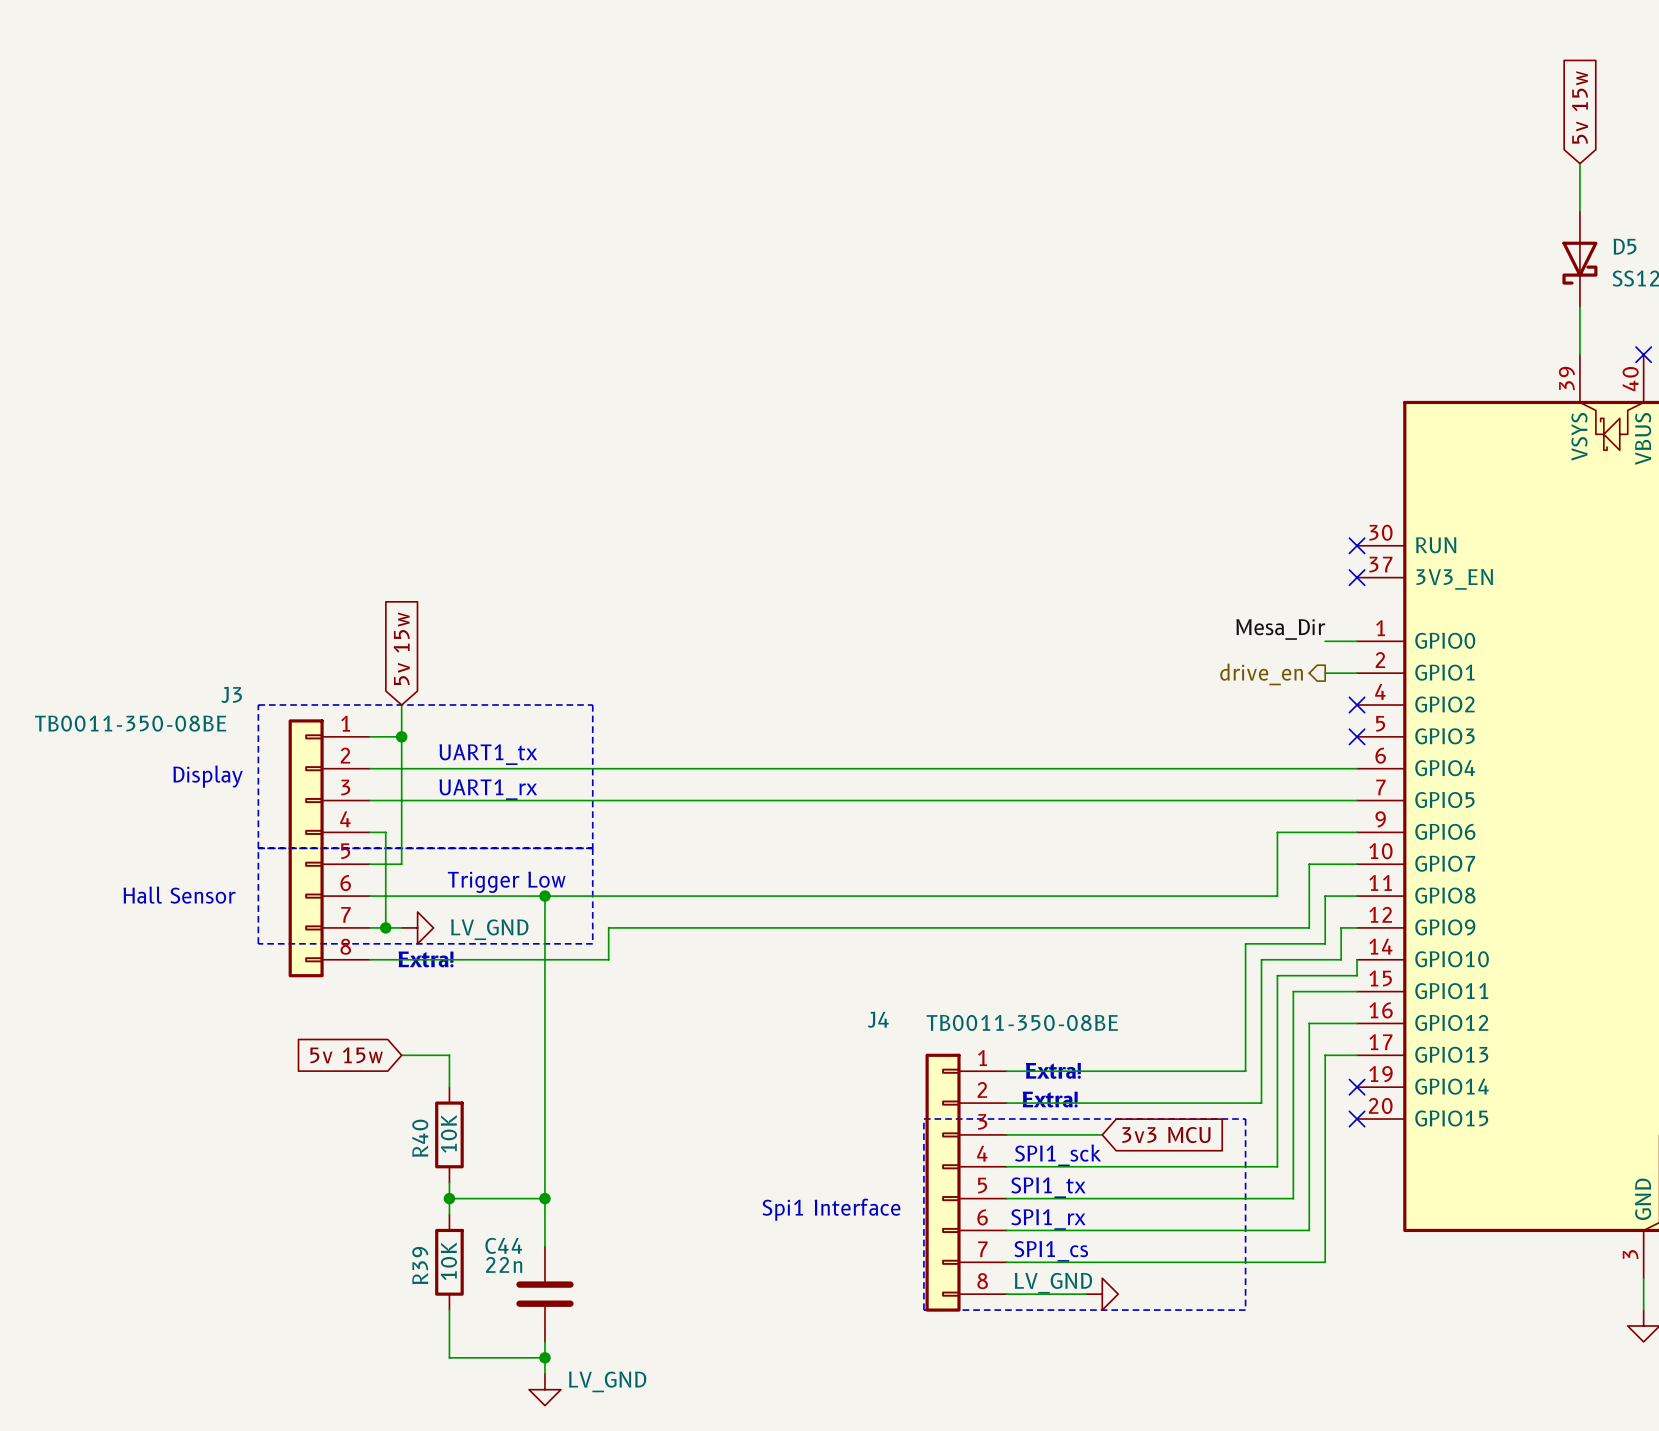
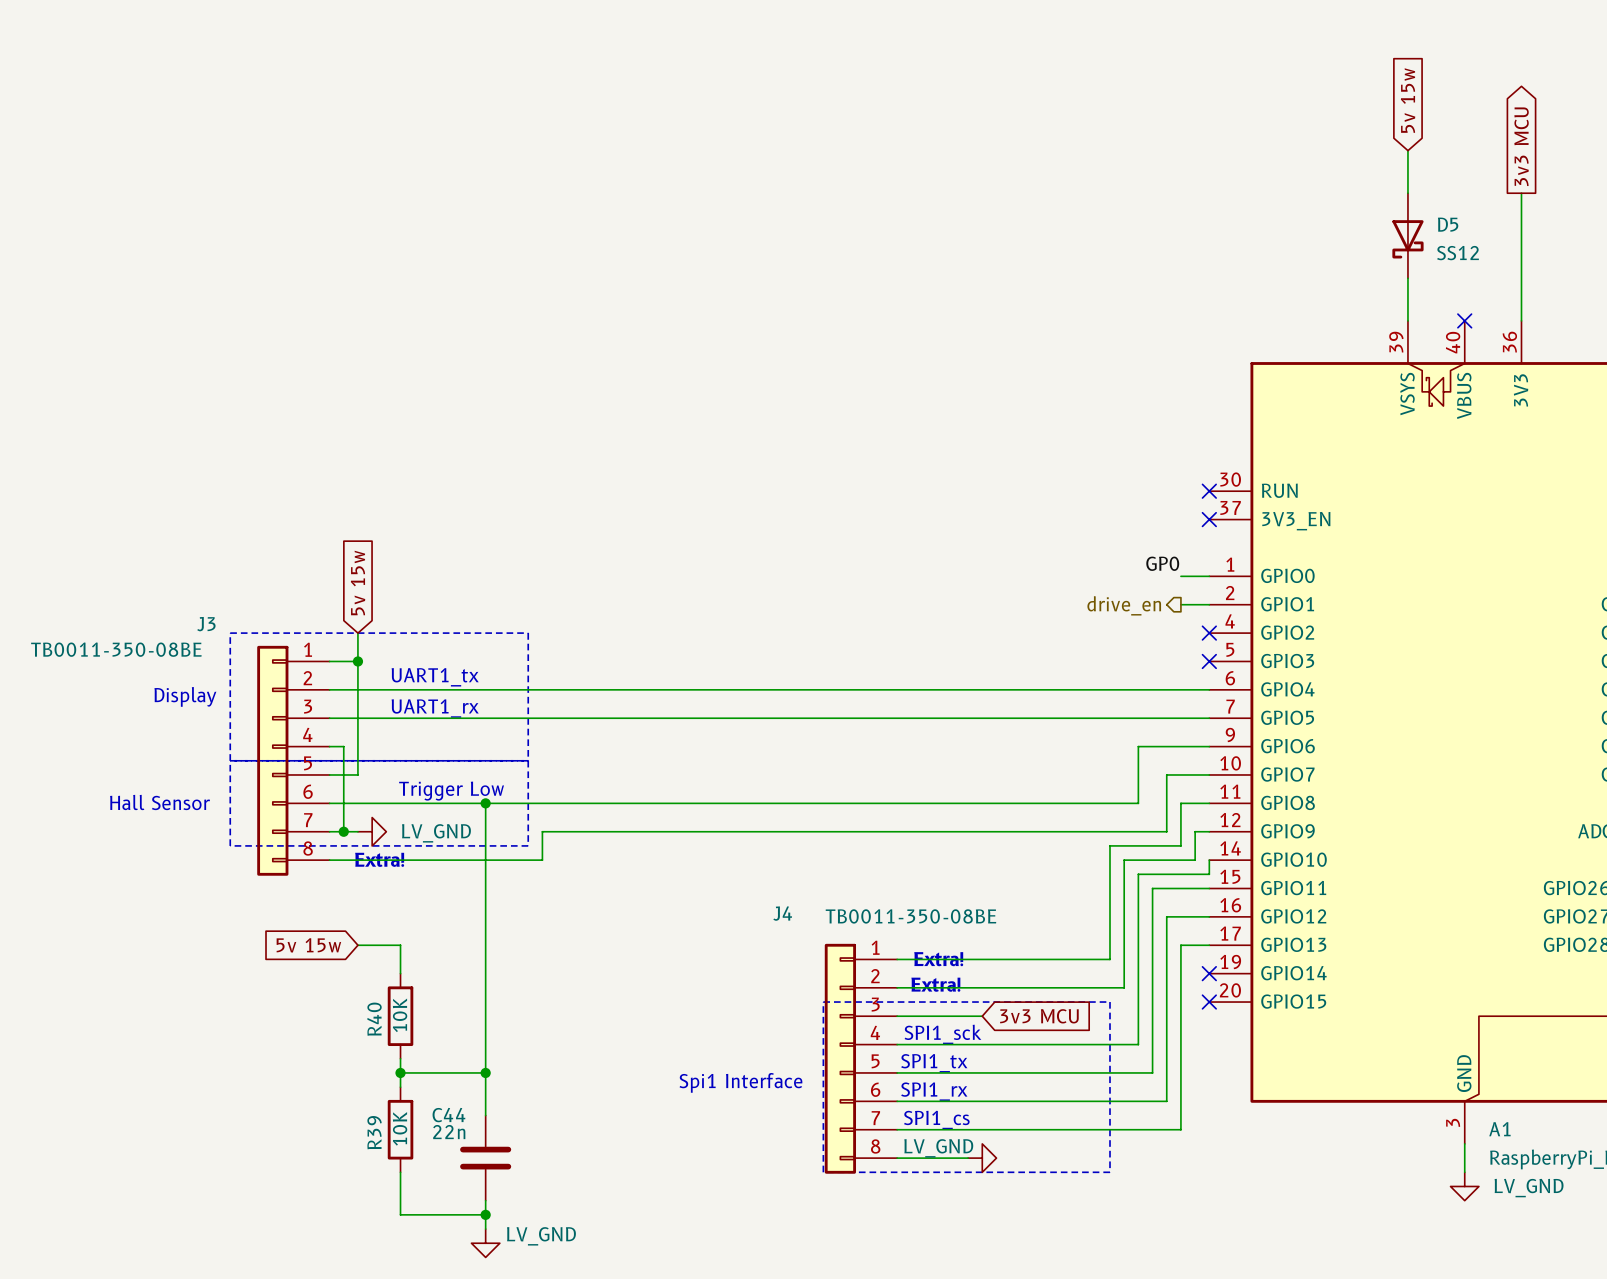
label: Mesa_Dir (1280, 629) -> GP0 (1162, 563)

